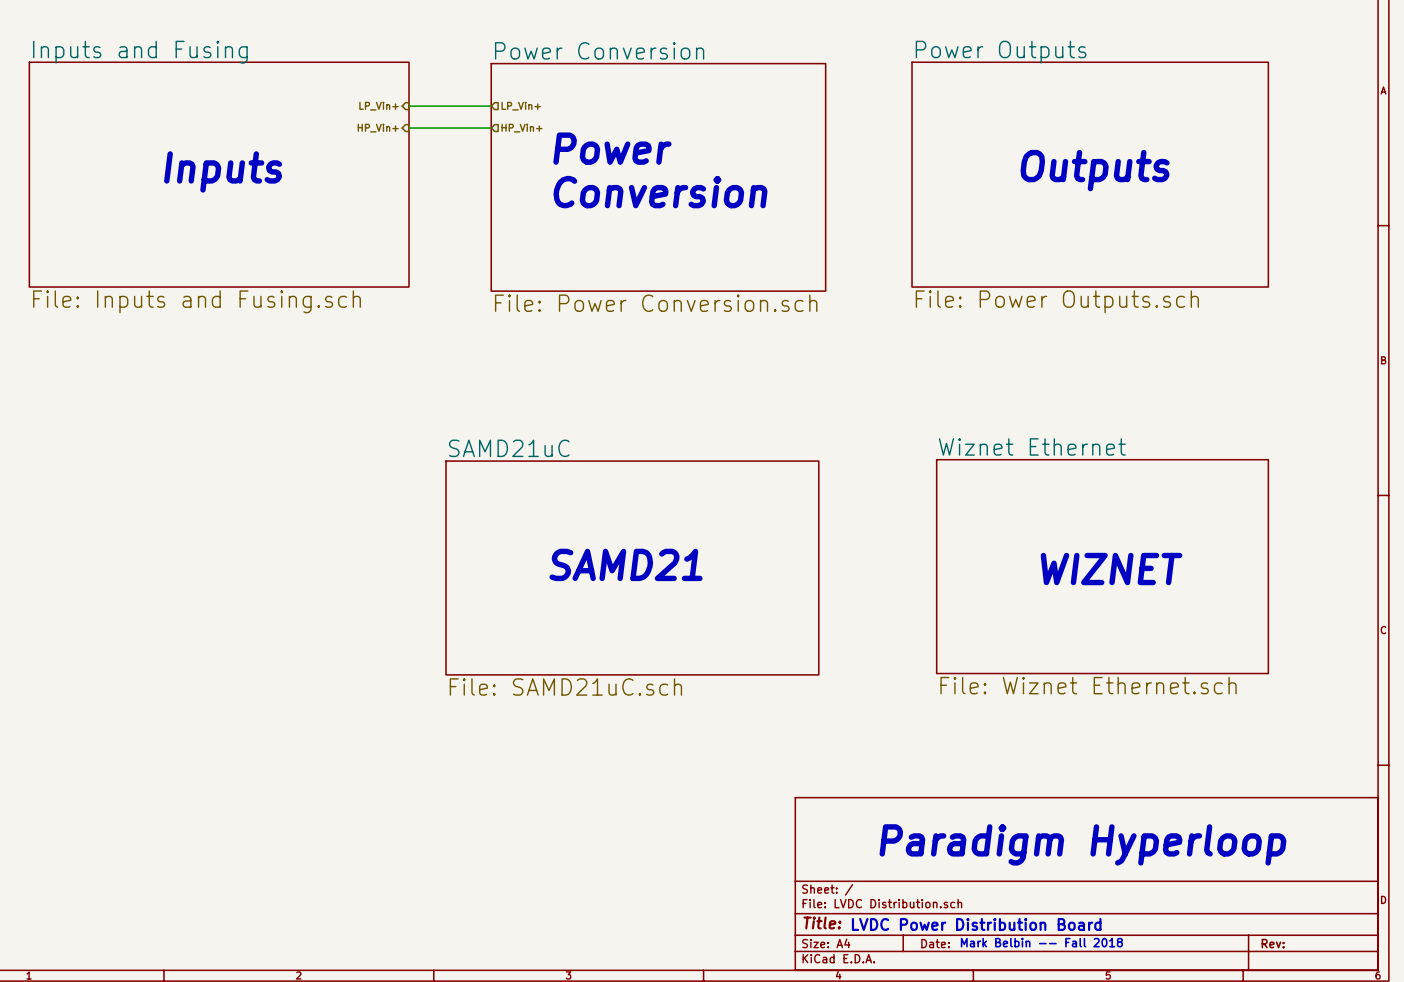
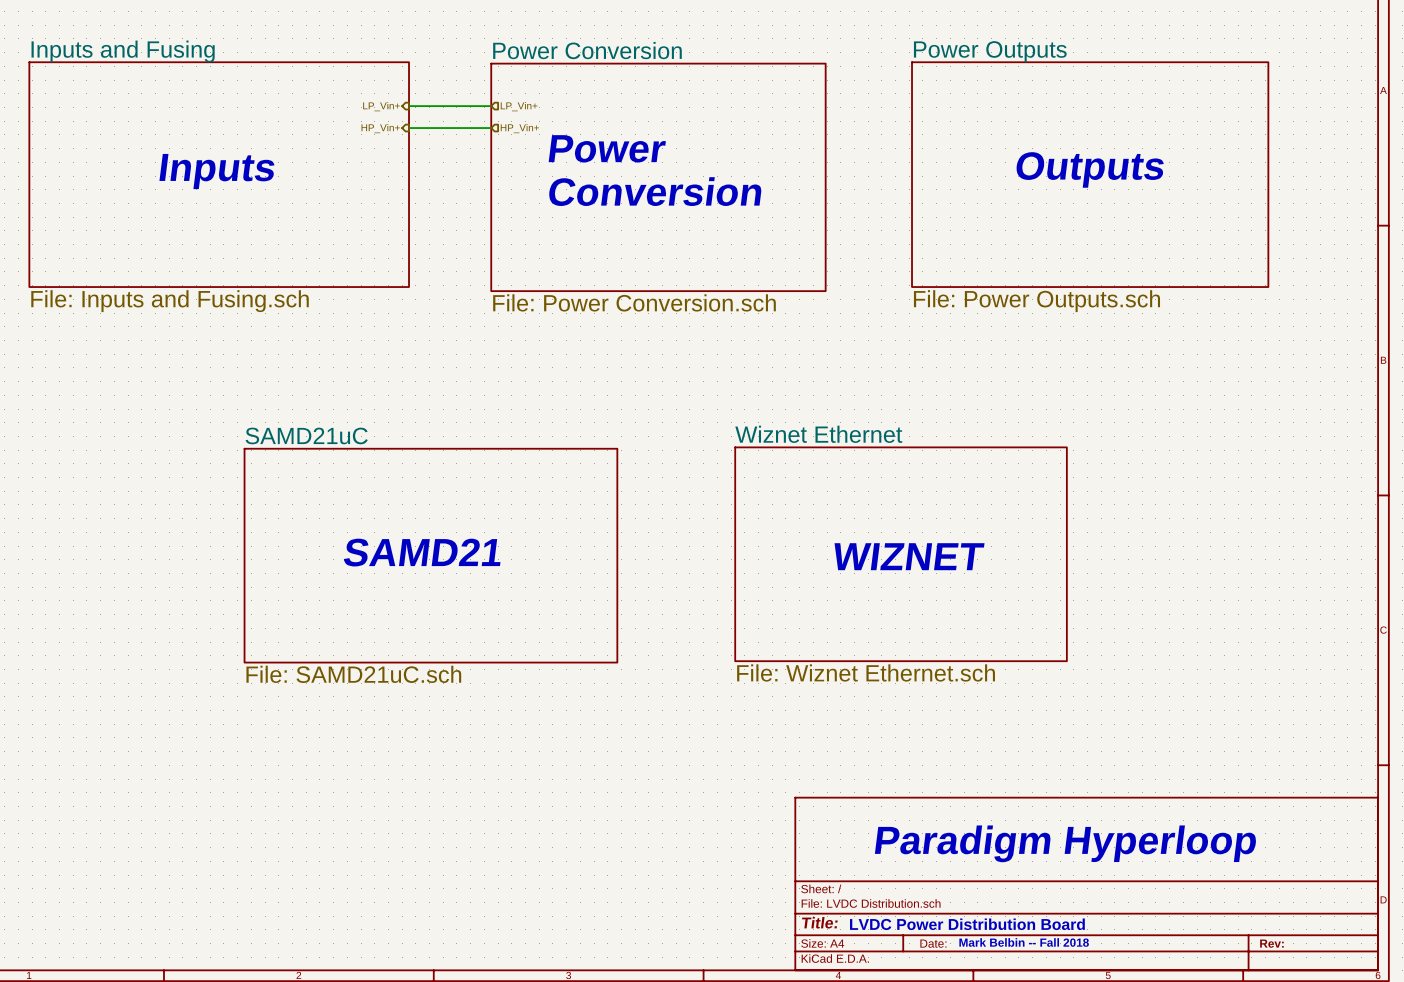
text: none -> SAMD21 (422, 552)
sheet Wiznet Ethernet: none -> File: Wiznet Ethernet.sch (901, 554)
text: none -> WIZNET (909, 556)
text: SAMD21 (626, 564) -> none
sheet Wiznet Ethernet: File: Wiznet Ethernet.sch (1102, 566) -> none
sheet SAMD21uC position: (632, 567) -> (430, 555)
text: WIZNET (1111, 569) -> none

